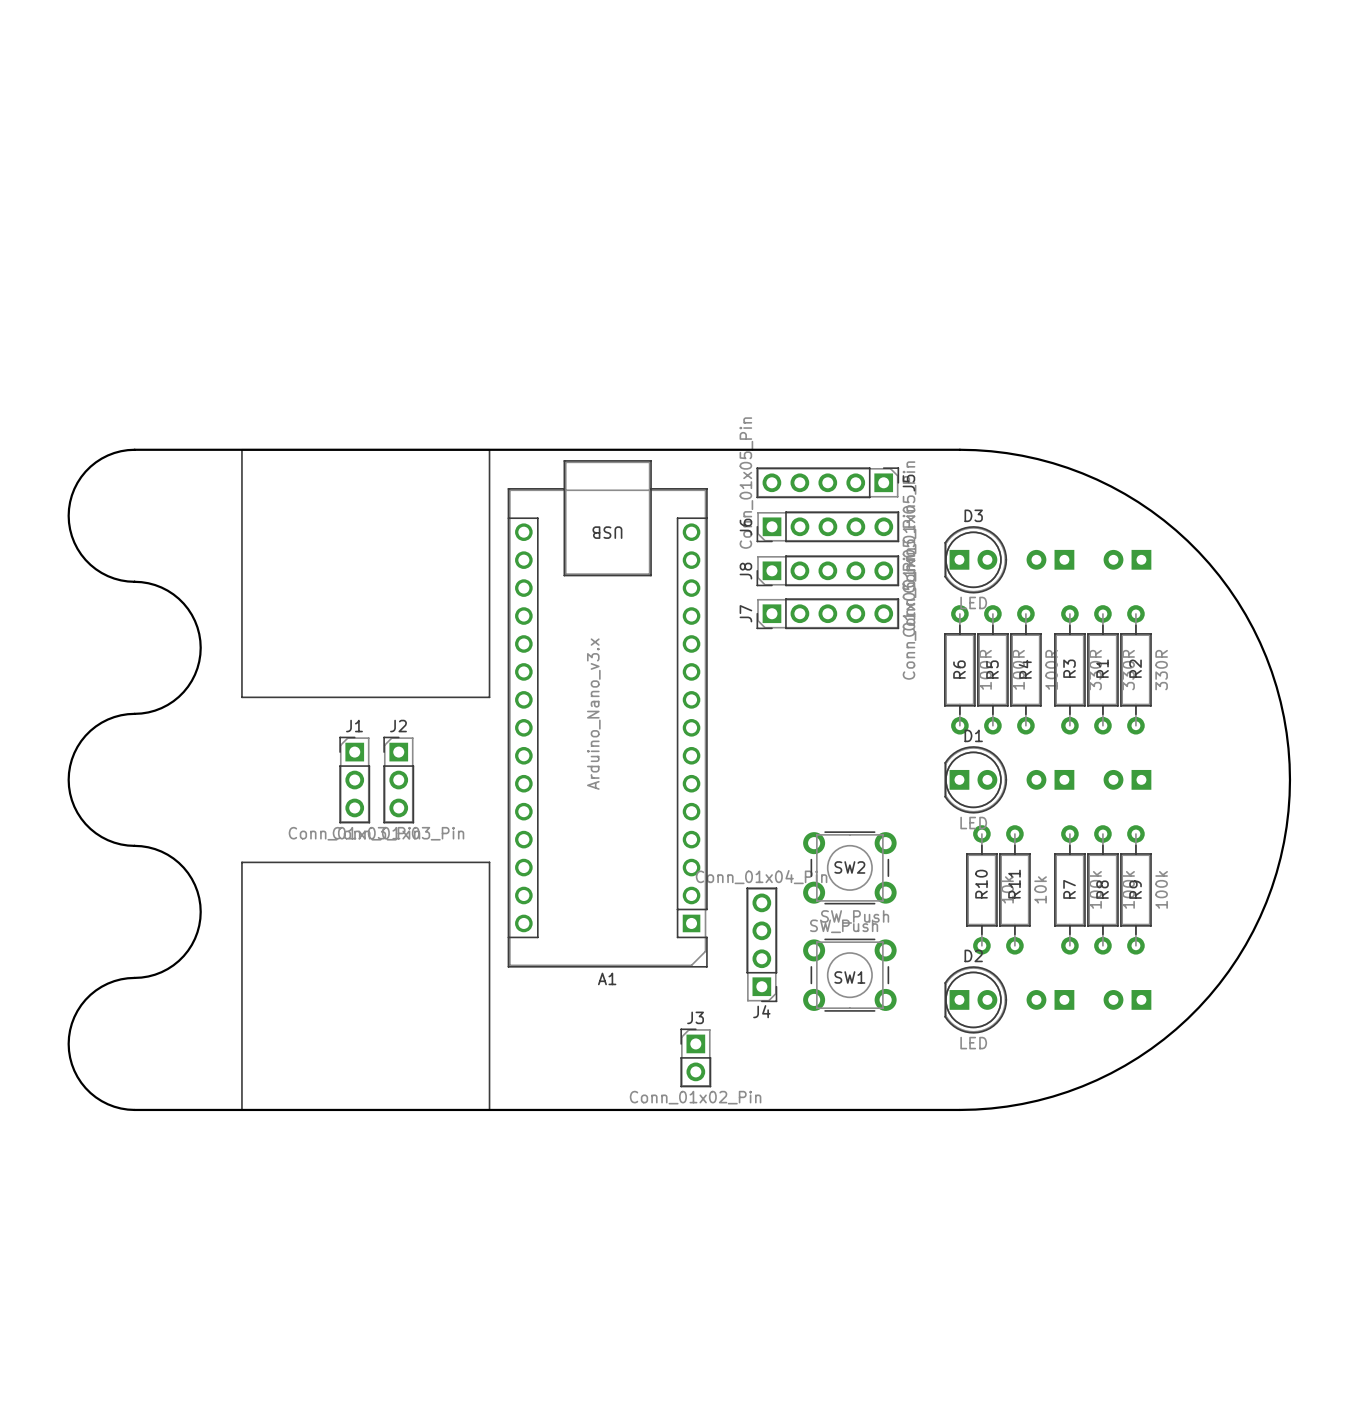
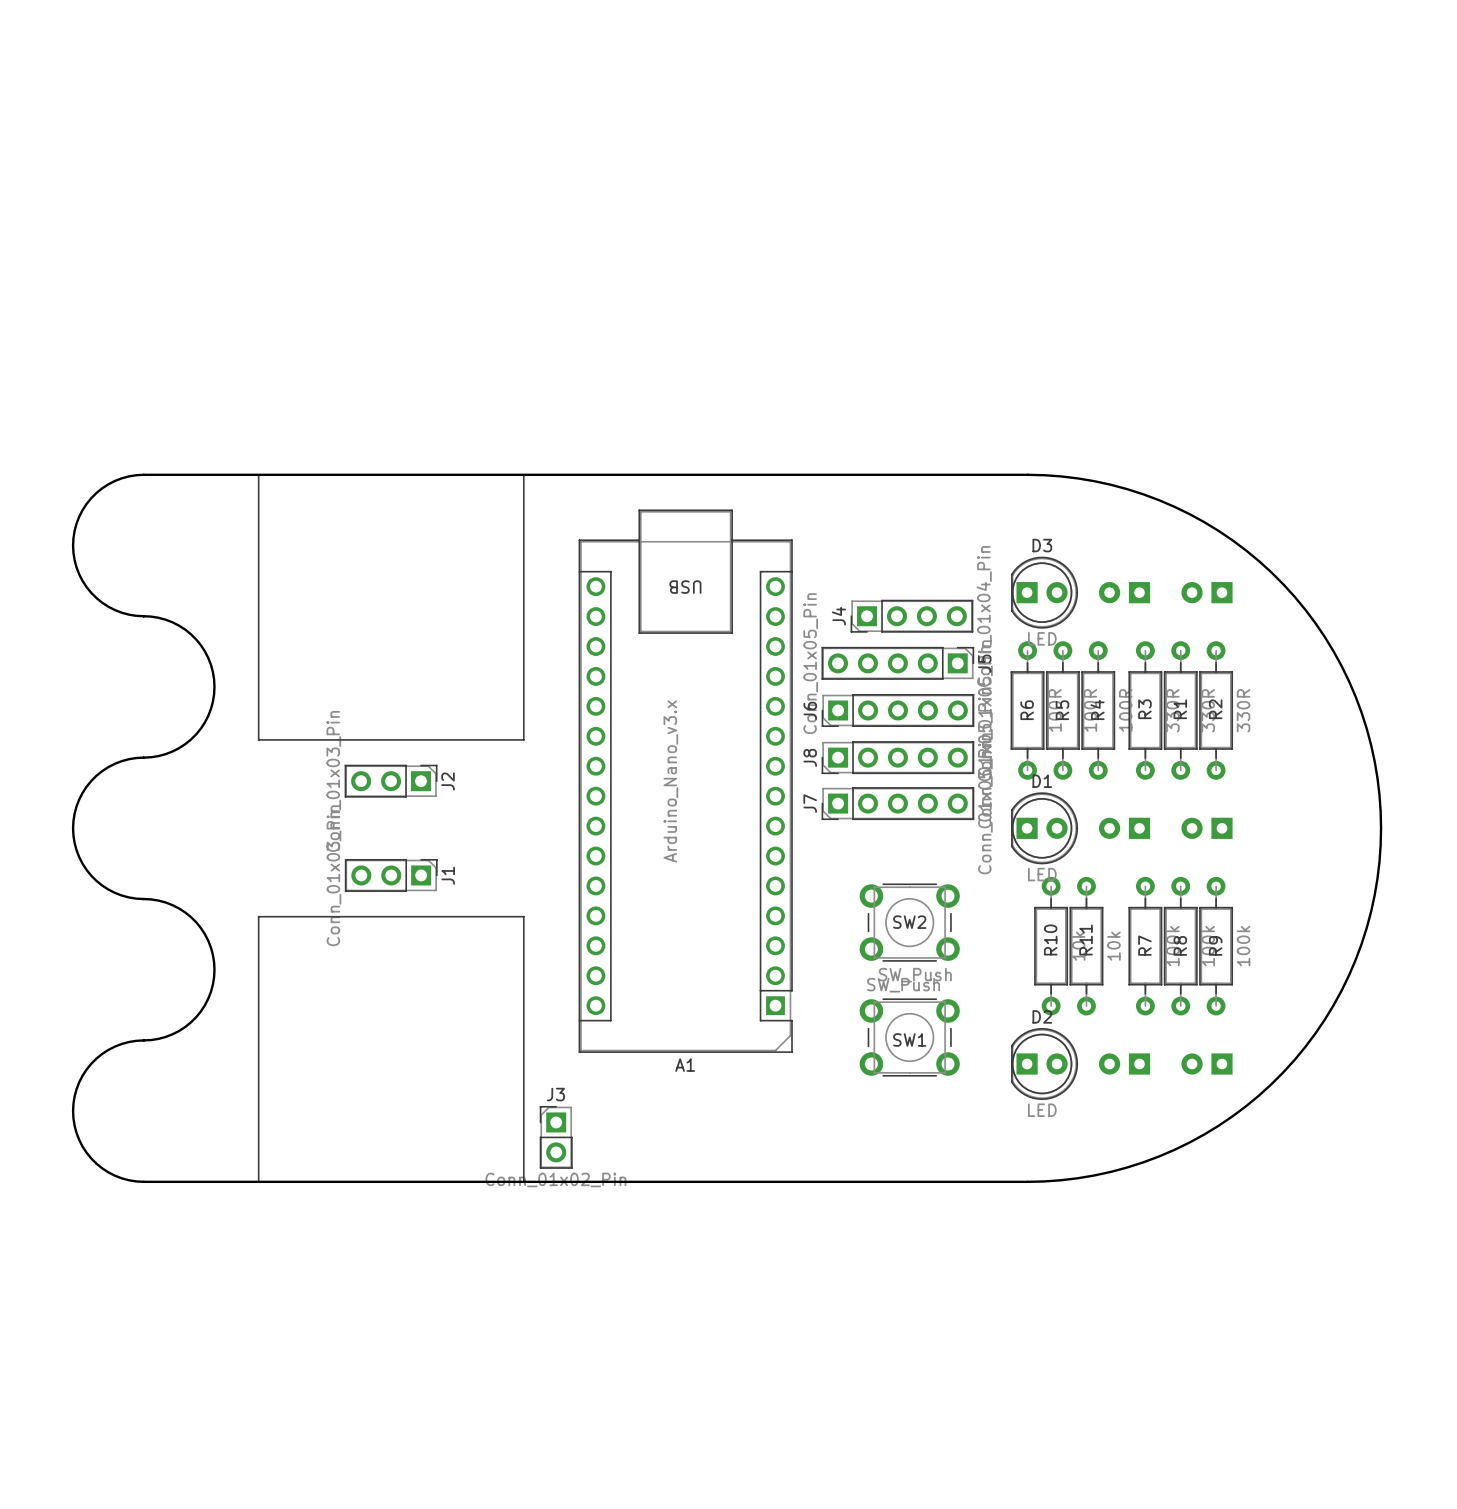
J5 position: (827, 482) -> (897, 663)
J6 position: (827, 526) -> (897, 710)
J8 position: (827, 570) -> (897, 757)
J7 position: (827, 613) -> (897, 803)
A1 position: (607, 713) -> (685, 781)
J1 rotation: 0° (354, 780) -> 90° clockwise (391, 875)
J2 rotation: 0° (398, 780) -> 90° clockwise (391, 781)
J2 position: (398, 780) -> (391, 781)
J4 rotation: 0° (761, 944) -> 90° clockwise (911, 616)
J4 position: (761, 944) -> (911, 616)
J3 position: (695, 1057) -> (556, 1137)

